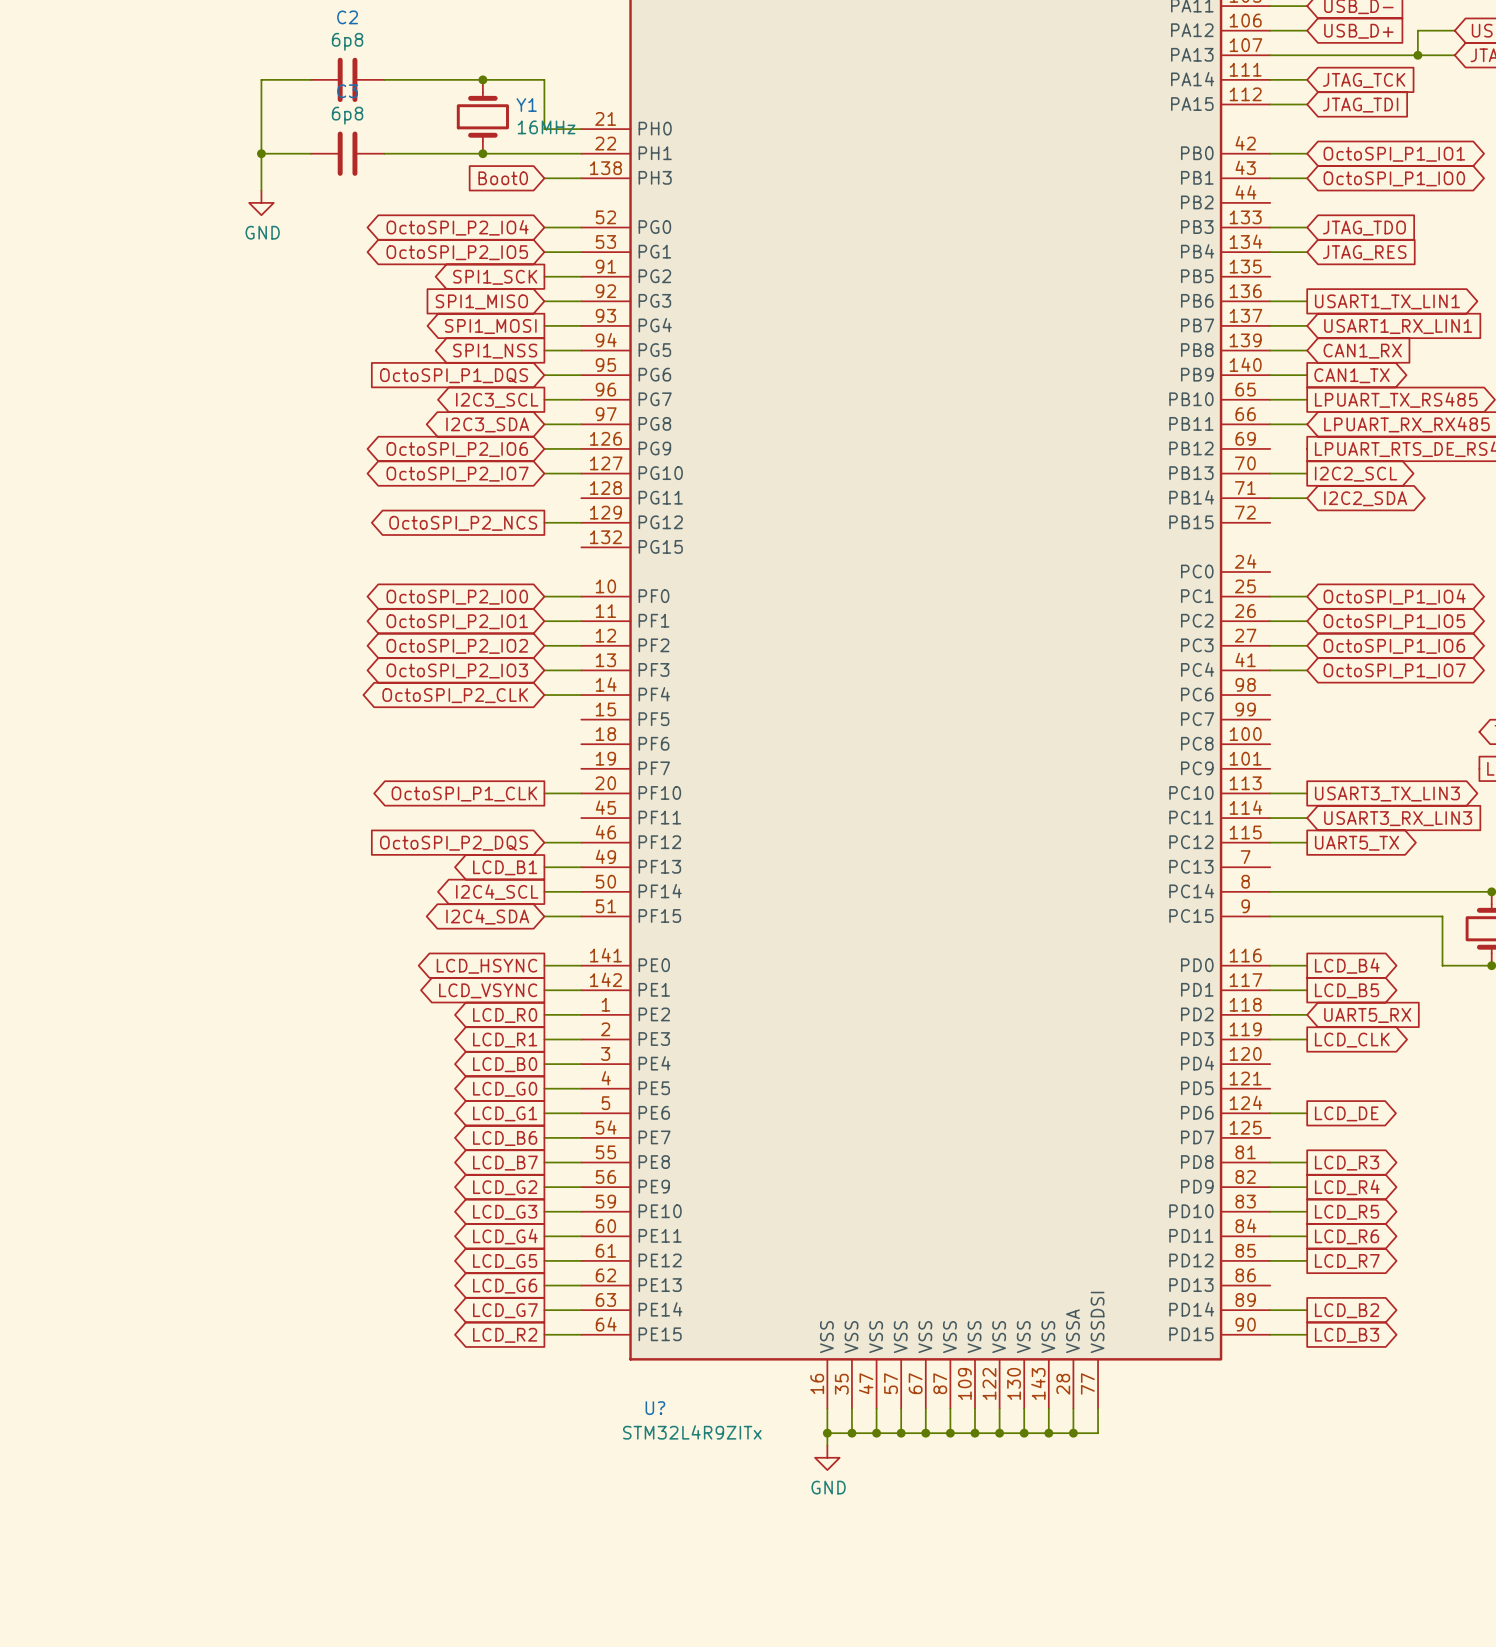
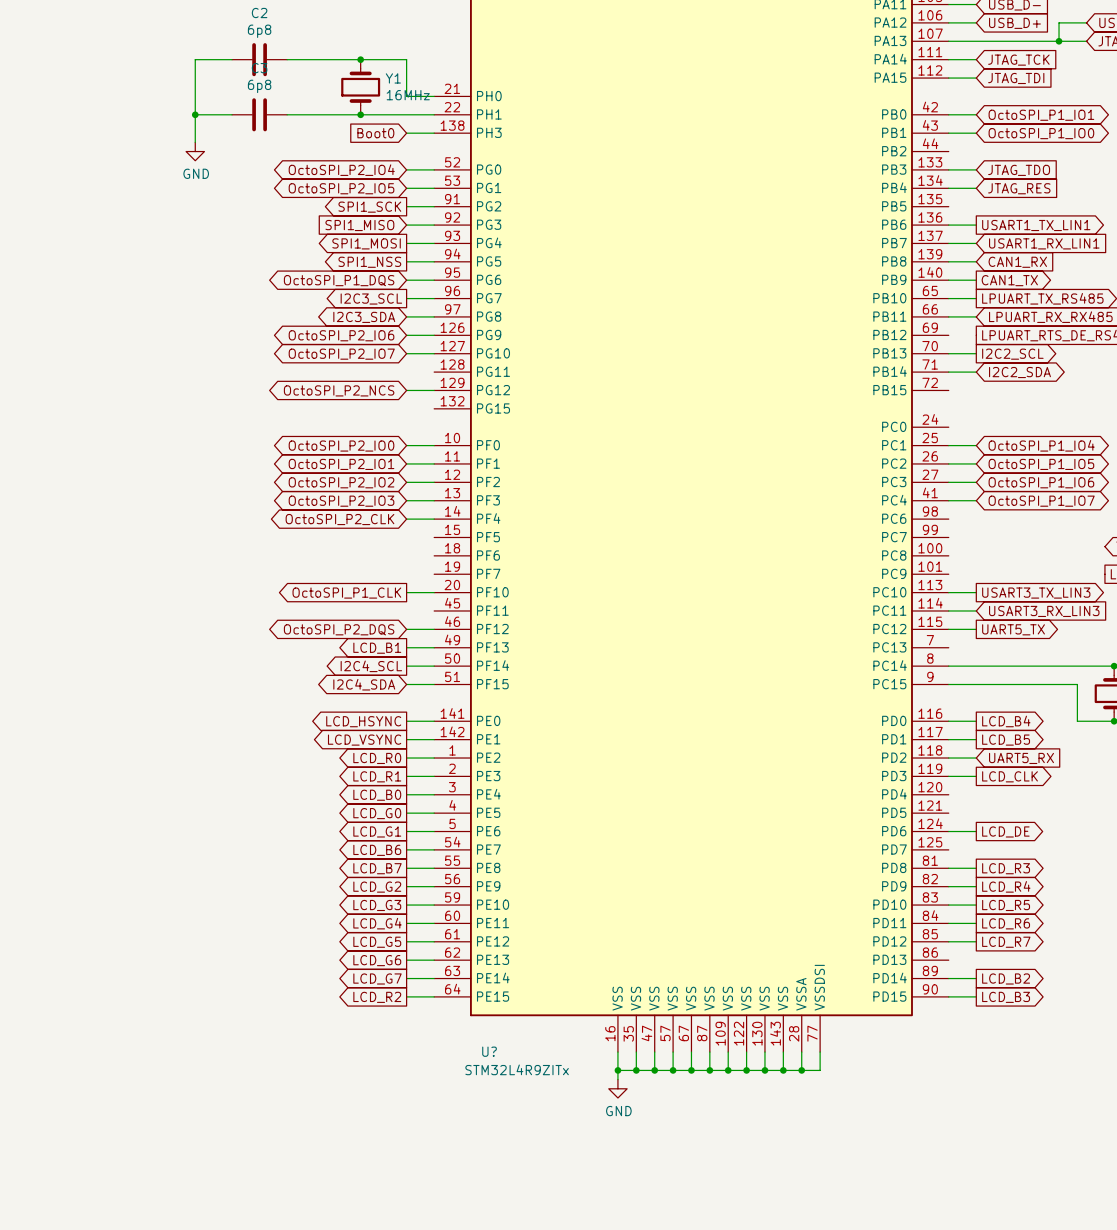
global label shape: input (454, 375) -> bidirectional (339, 280)
global label shape: output (463, 523) -> bidirectional (339, 390)
global label shape: input (454, 843) -> bidirectional (339, 629)

